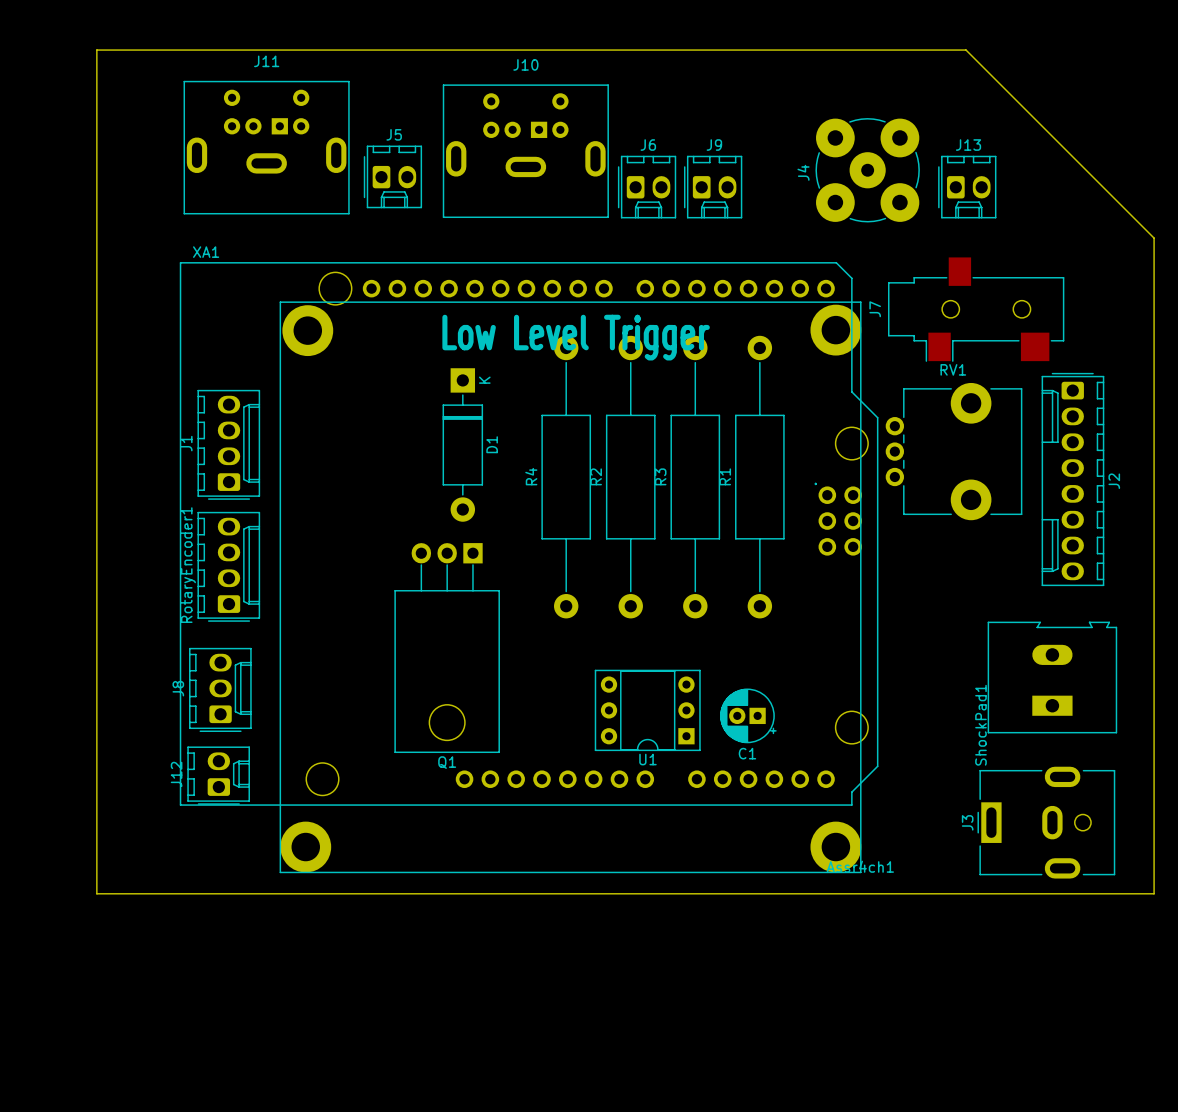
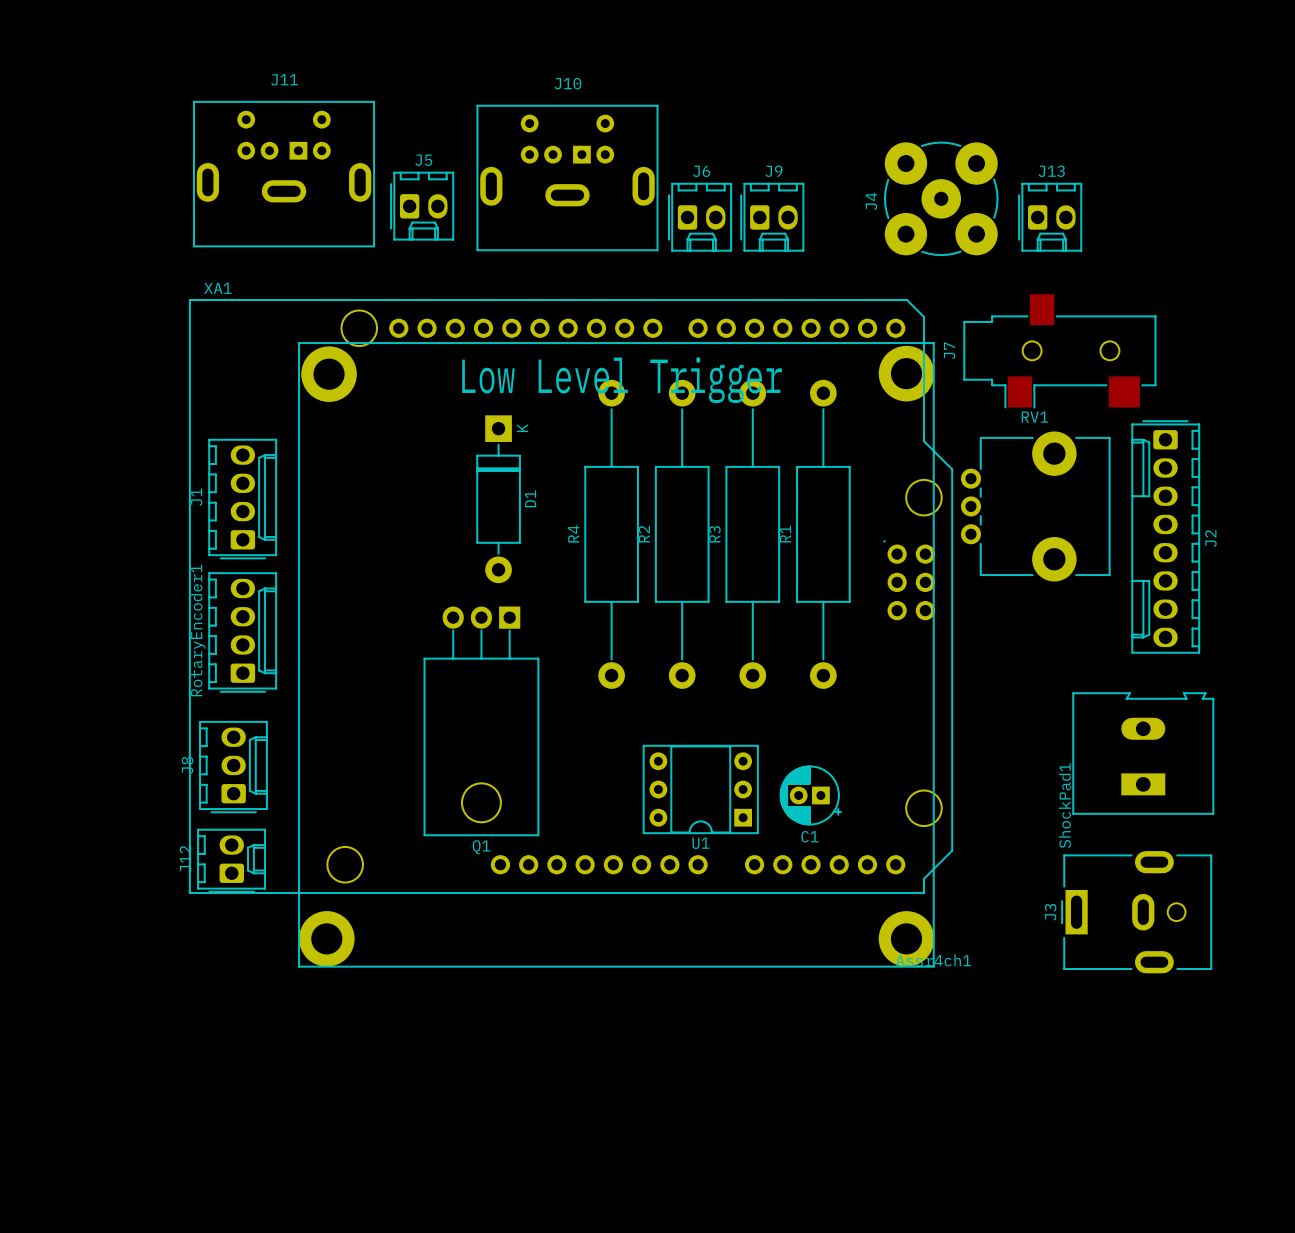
board edge: (96, 50) (96, 893) (1154, 893) (1154, 238) (966, 50) (96, 50) -> none

